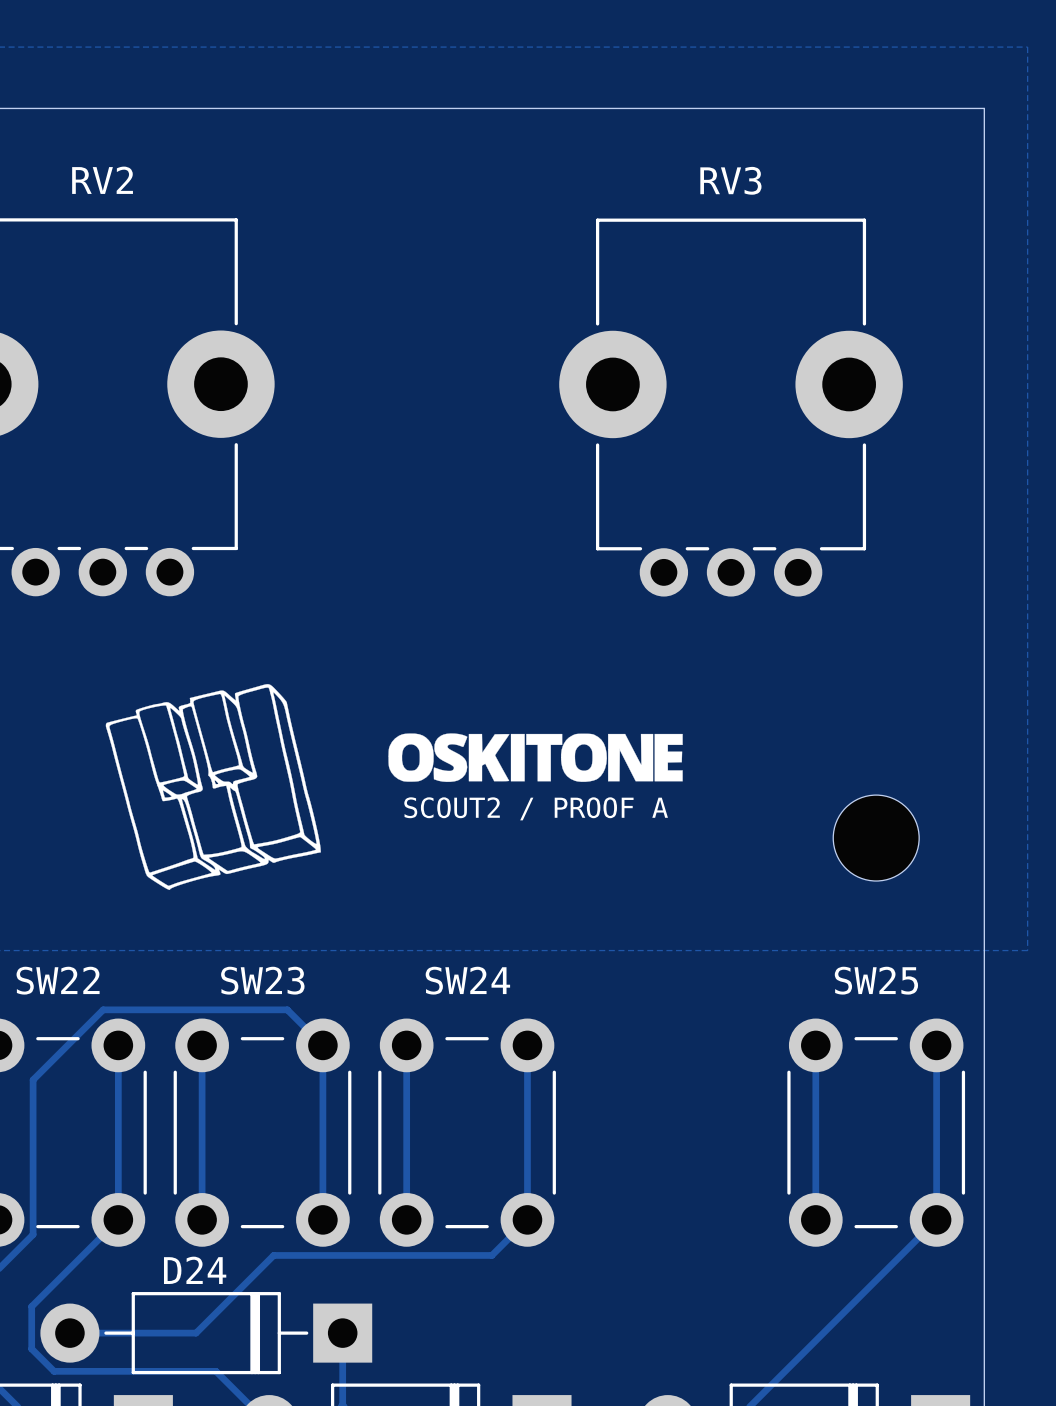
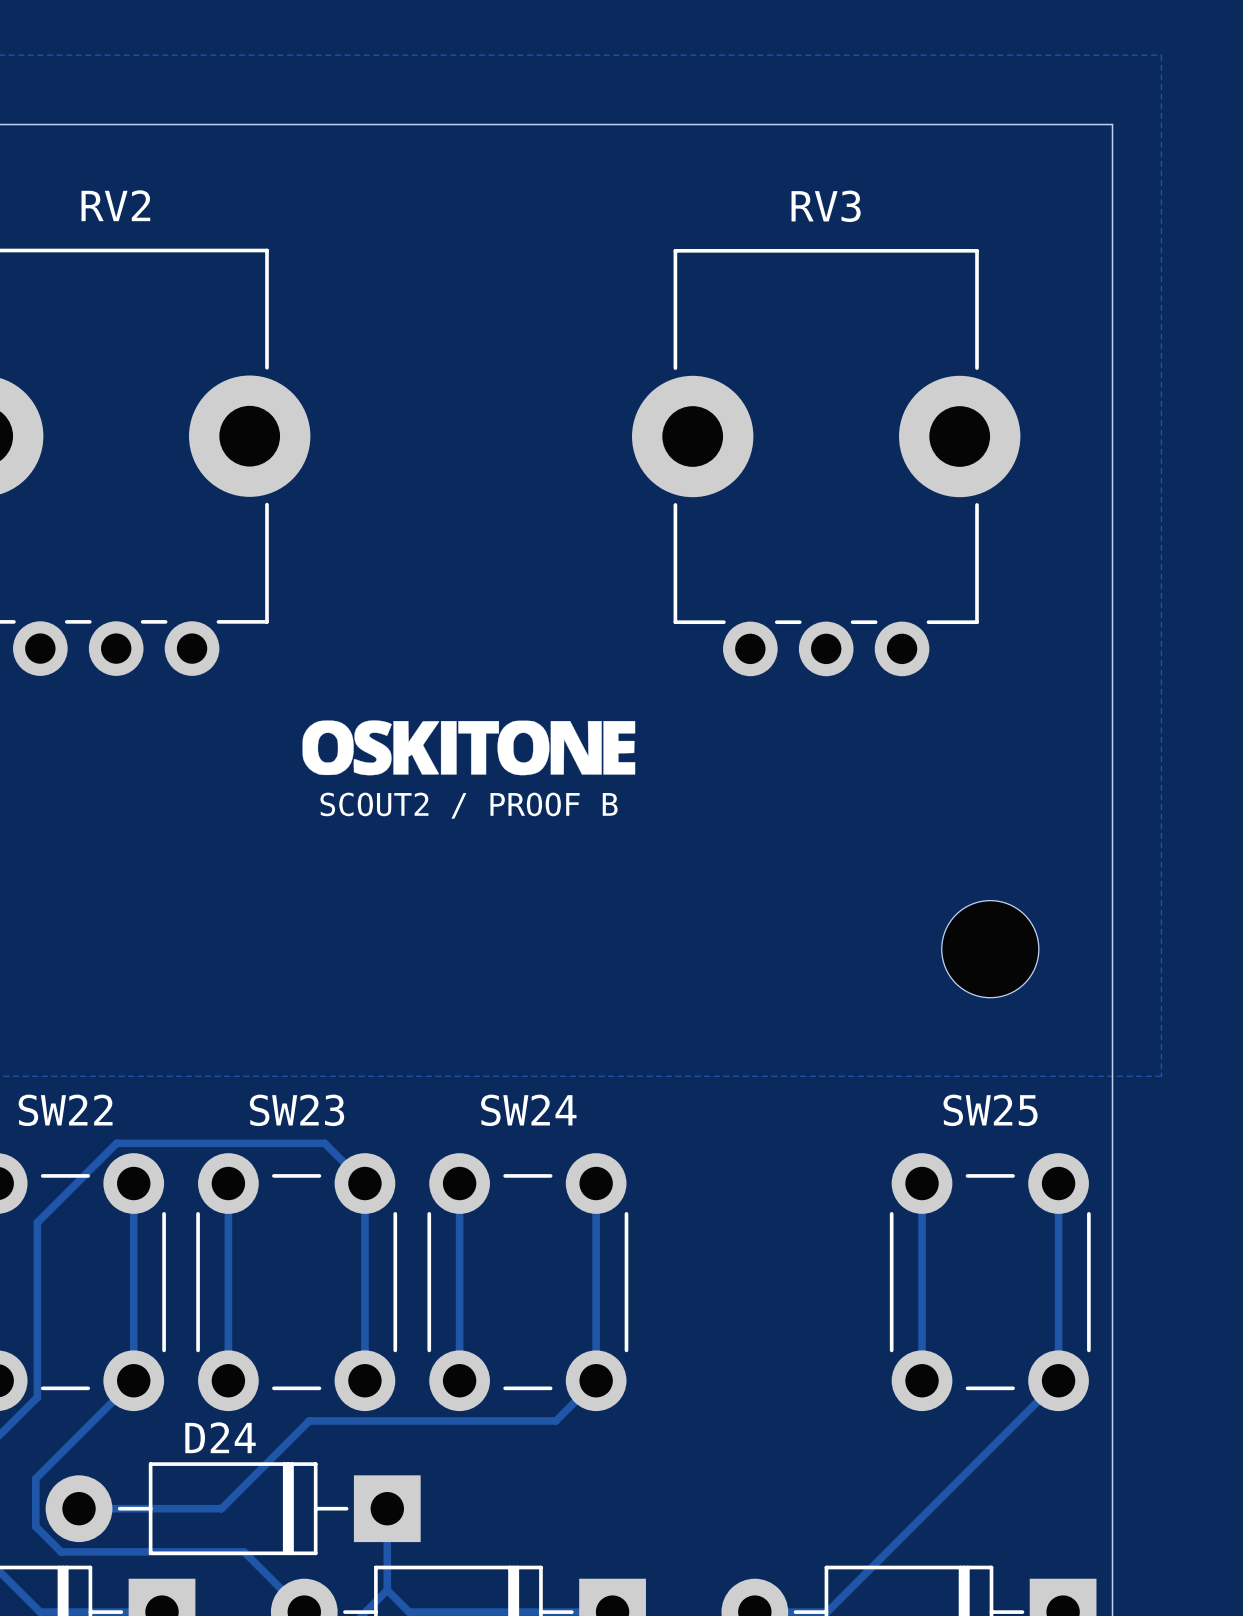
drawing: [105, 684, 321, 890] -> none
text: none -> SCOUT2 / PROOF B (469, 805)
drawing position: (535, 757) -> (468, 747)
text: SCOUT2 / PROOF A (536, 808) -> none

